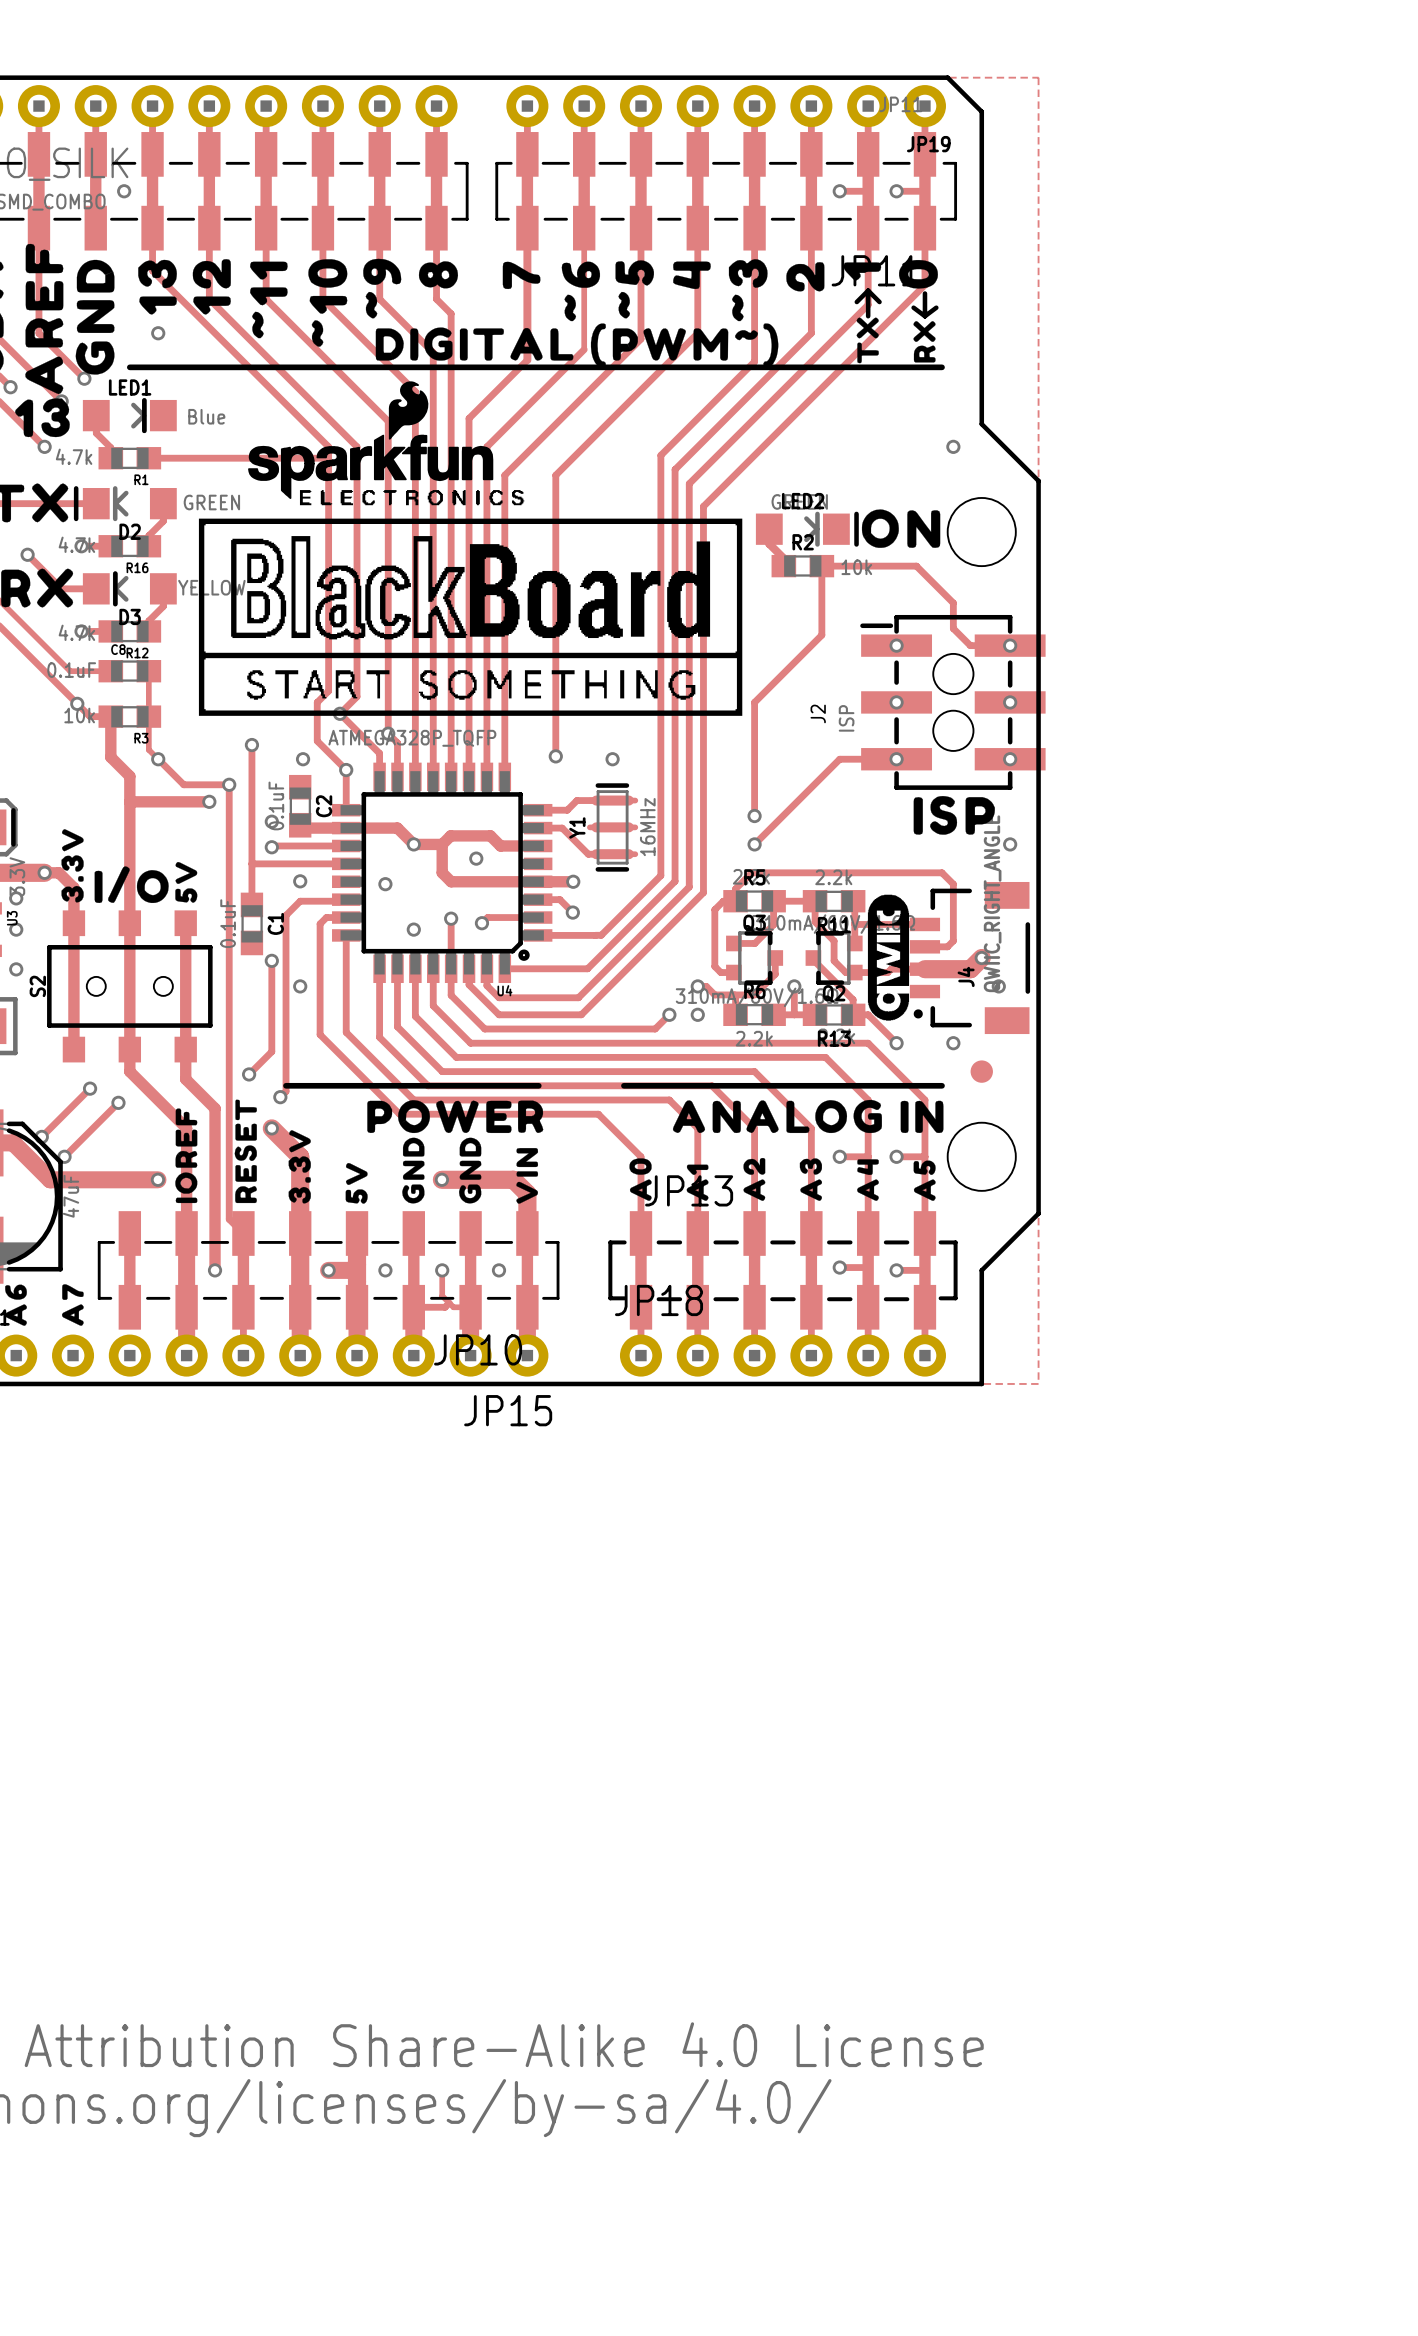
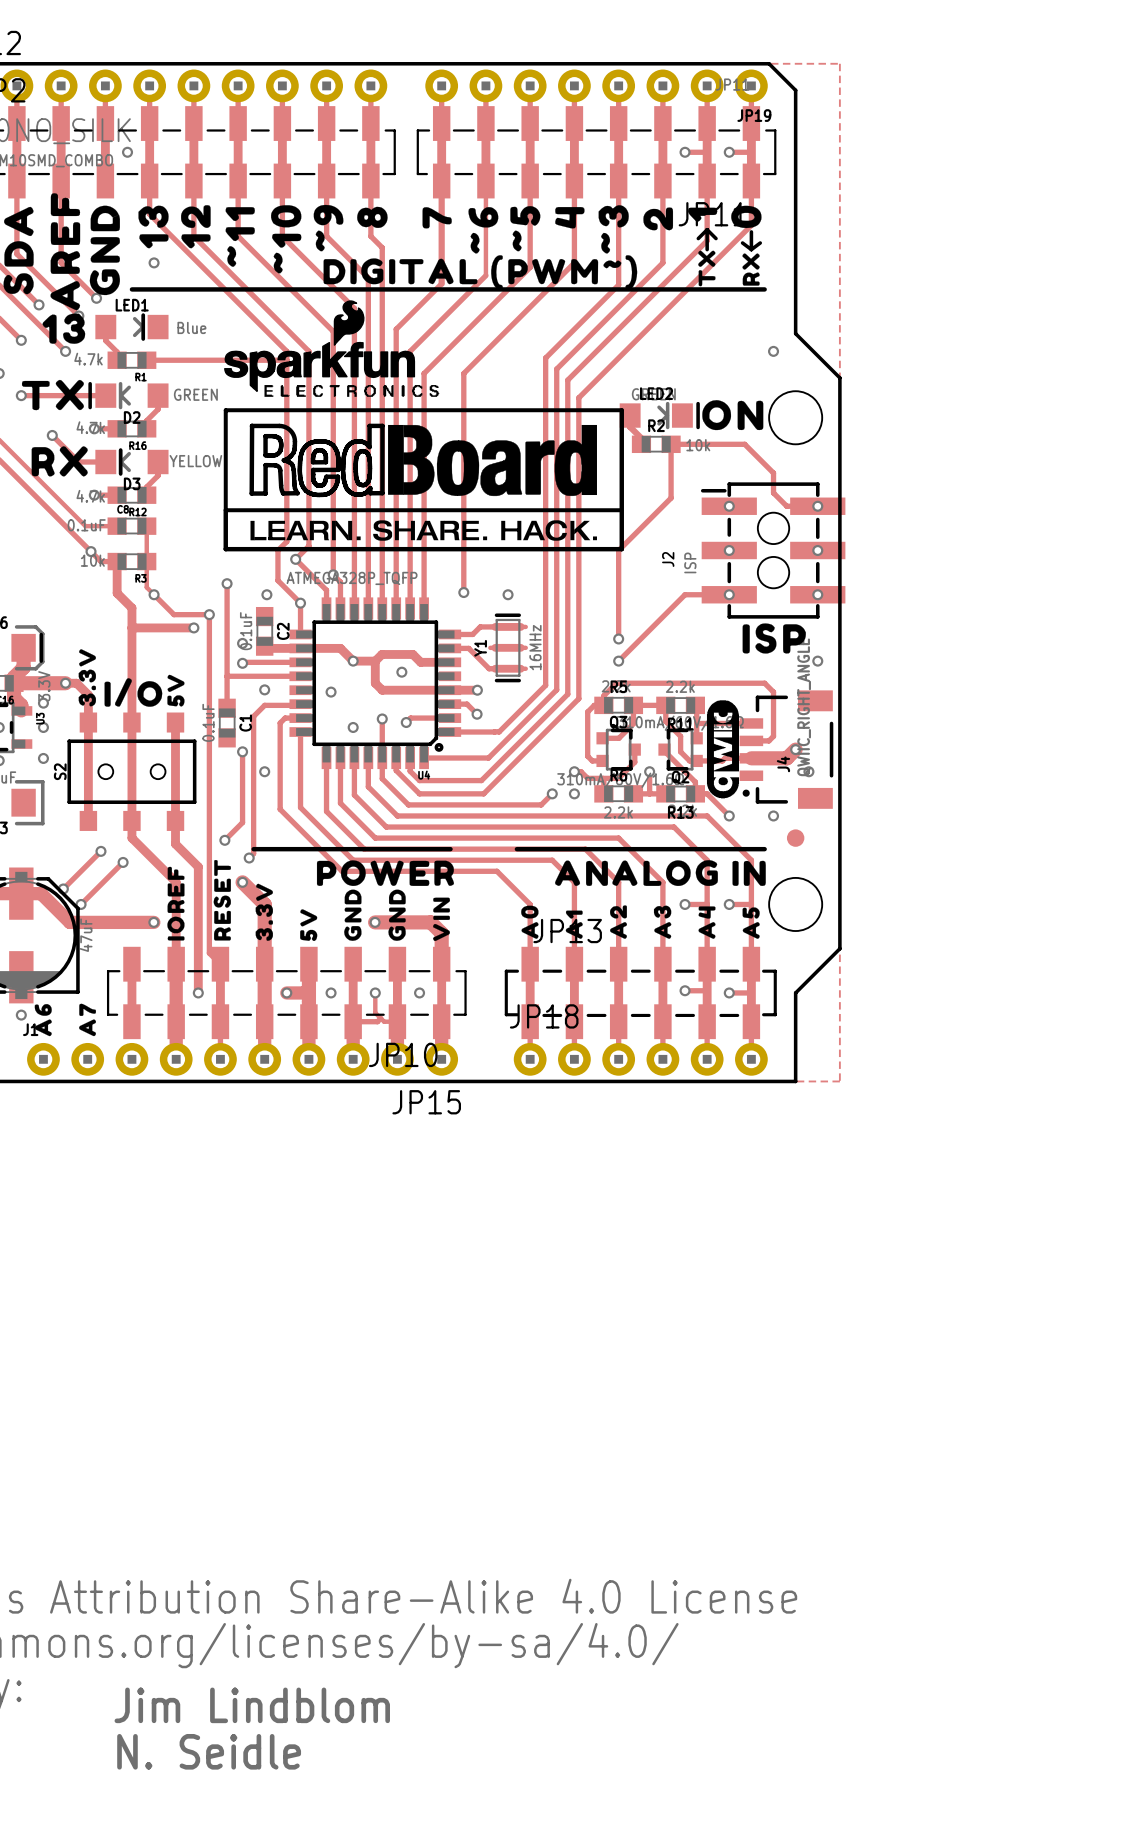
drawing: [198, 518, 743, 716] -> none
drawing: none -> [223, 408, 624, 552]
text: none -> Jim Lindblom (252, 1705)
text: none -> N. Seidle (209, 1751)

